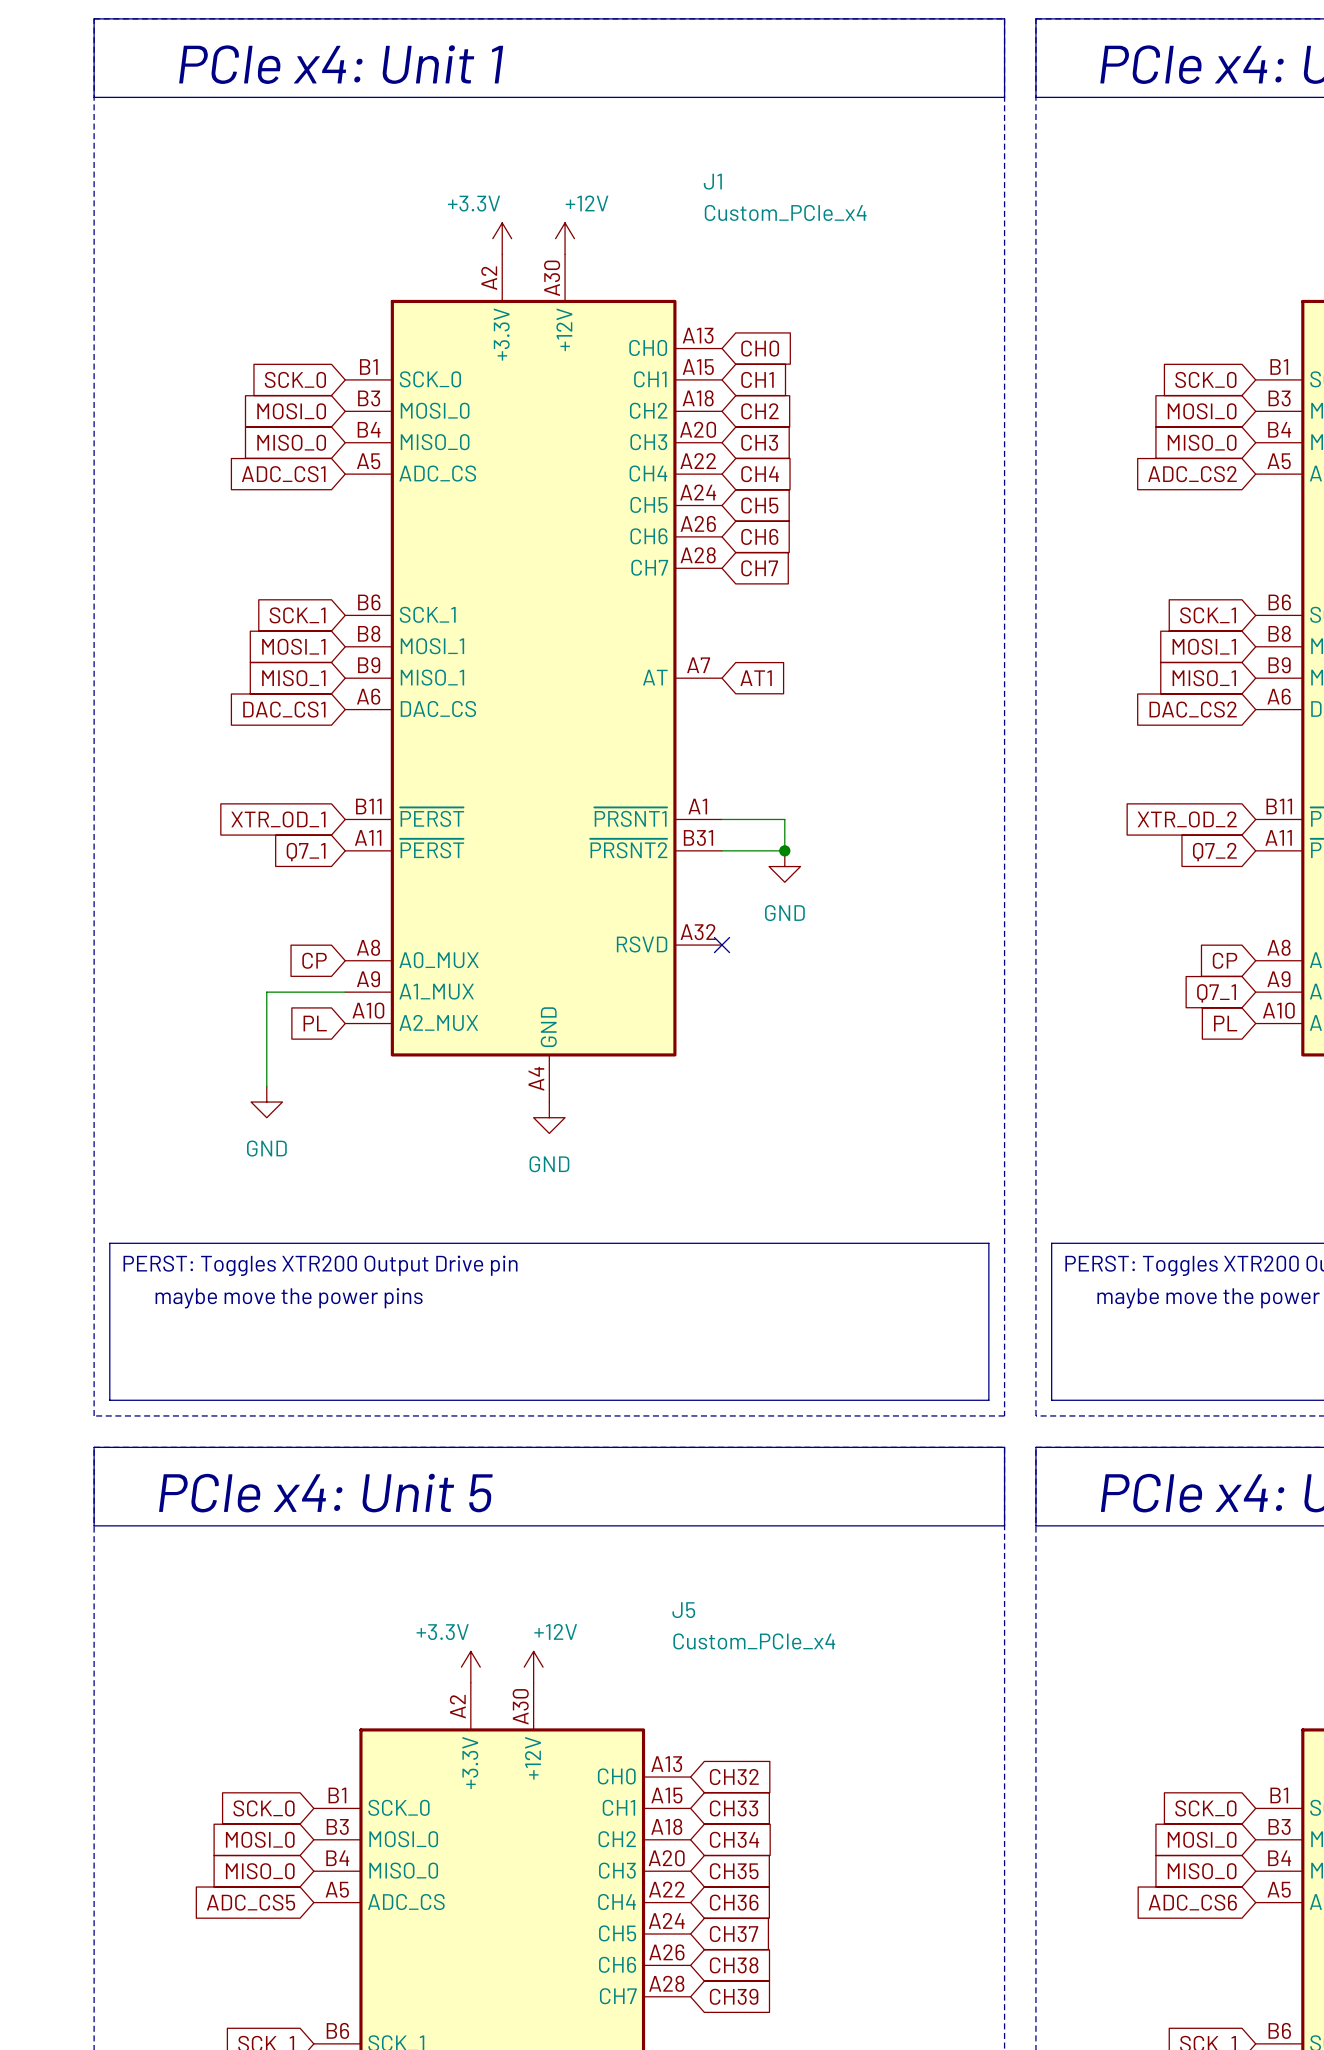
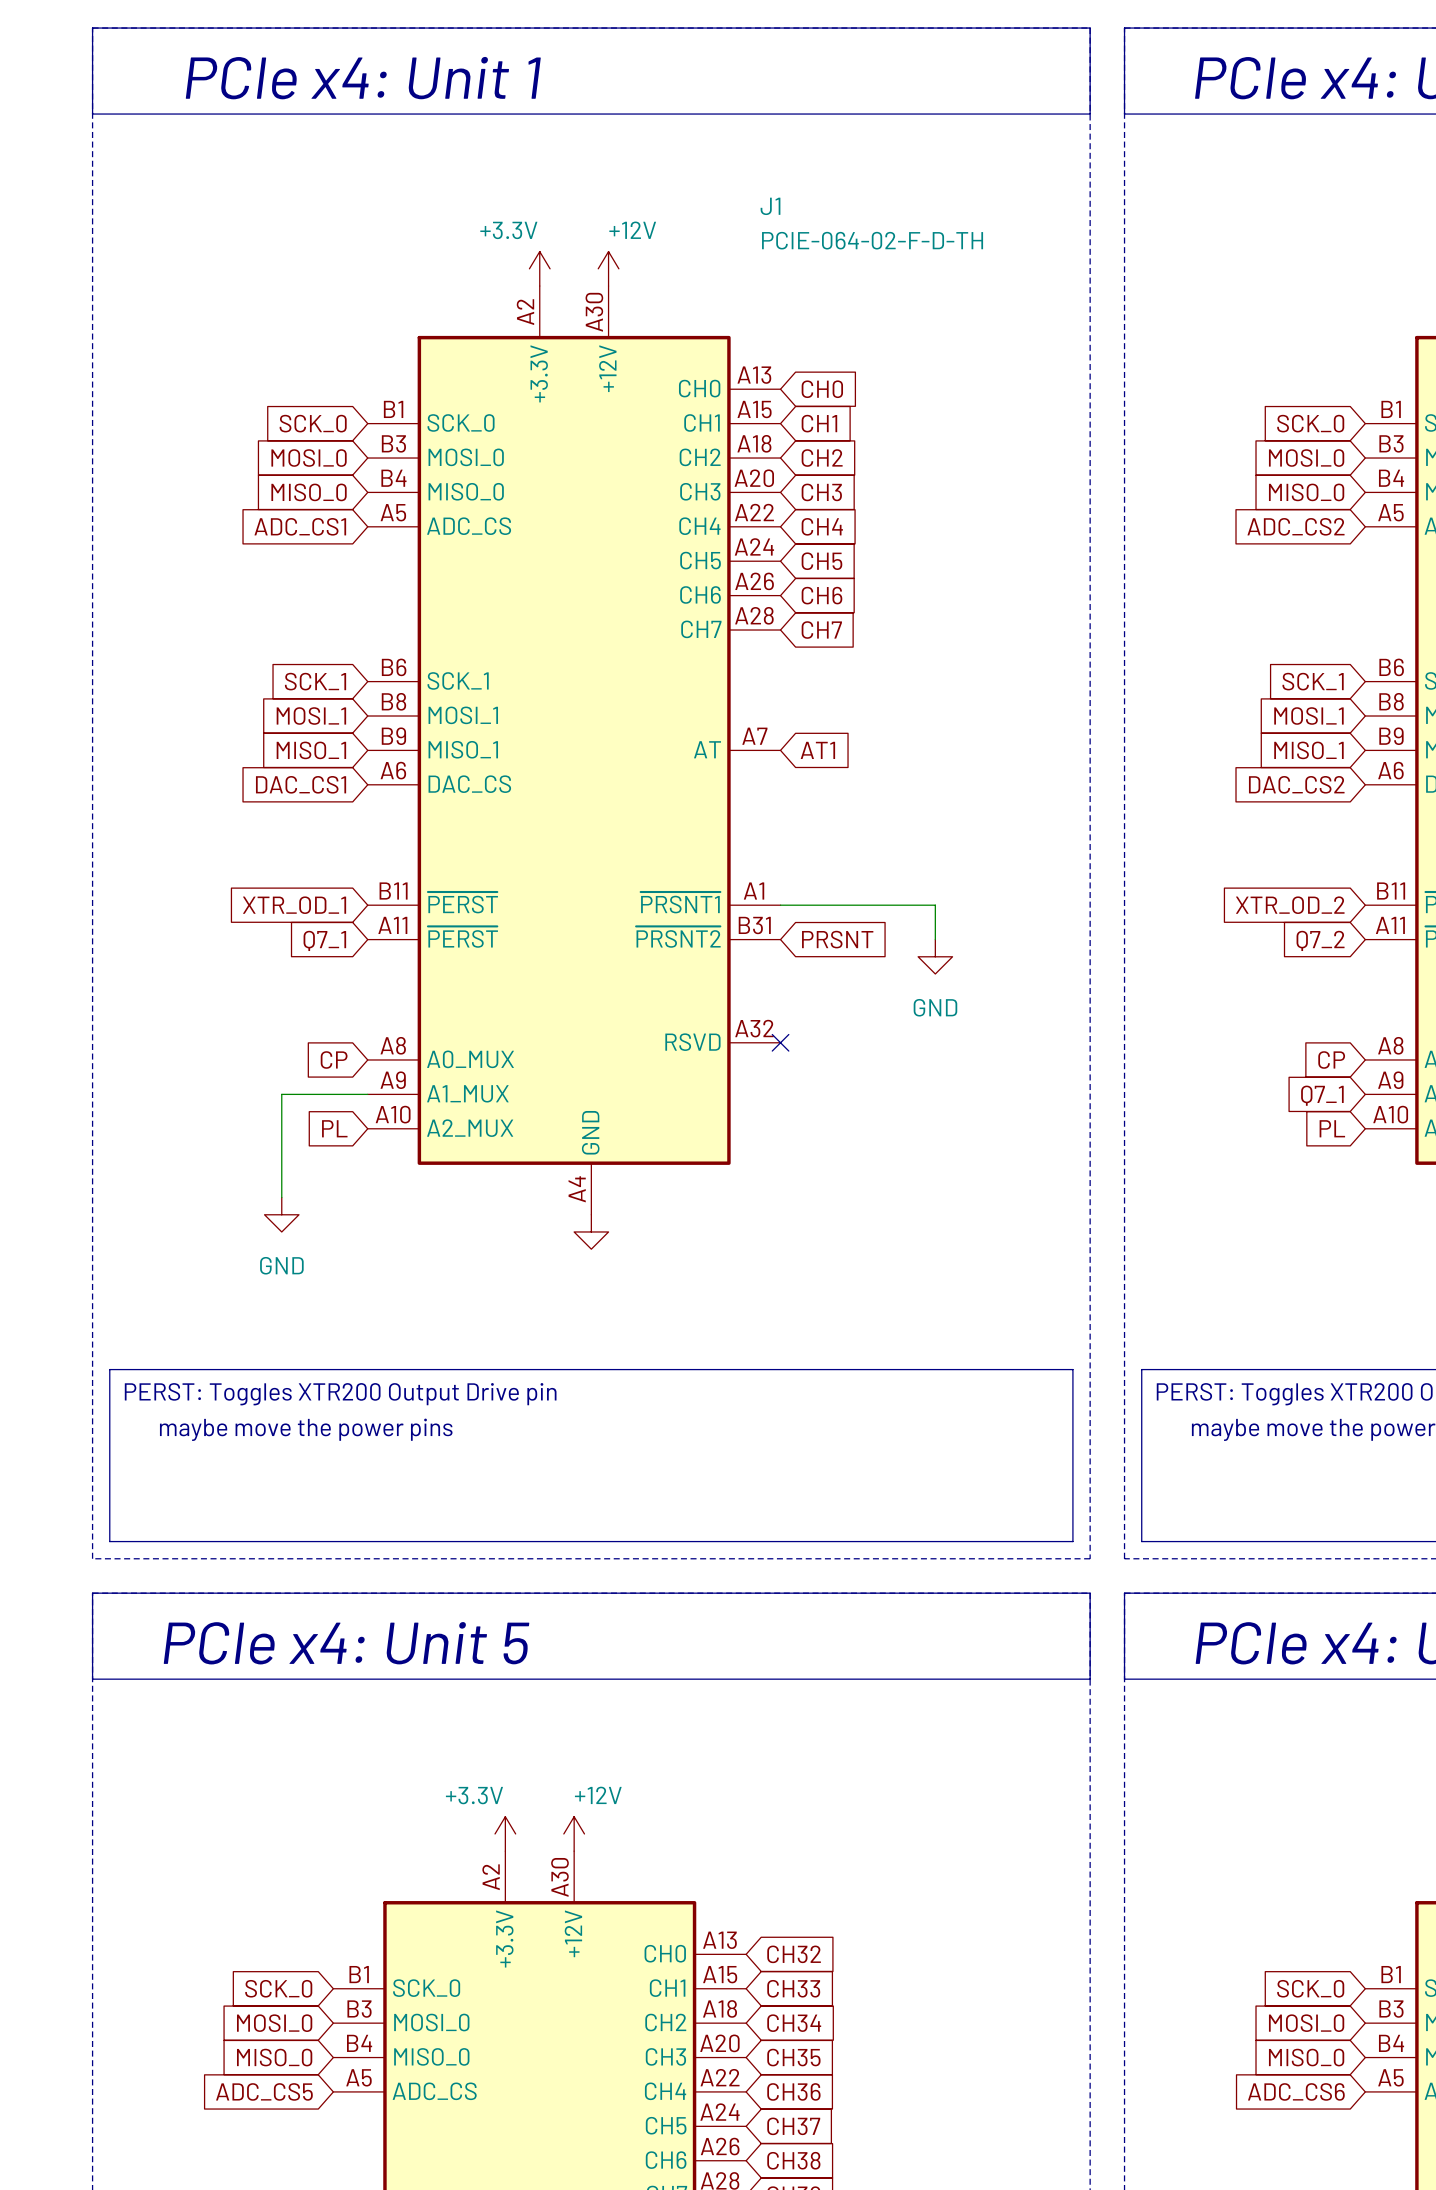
J1 value: Custom_PCIe_x4 (785, 212) -> PCIE-064-02-F-D-TH (872, 240)
wire: (784, 819) (784, 850) (722, 850) -> (849, 905) (935, 905) (935, 939)
global label: none -> PRSNT (837, 939)
junction: (784, 850) -> none
power symbol position: GND (784, 866) -> GND (935, 956)
power symbol text: GND (549, 1164) -> none
J5 name: J5 (683, 1610) -> none
J5 value: Custom_PCIe_x4 (754, 1641) -> none

